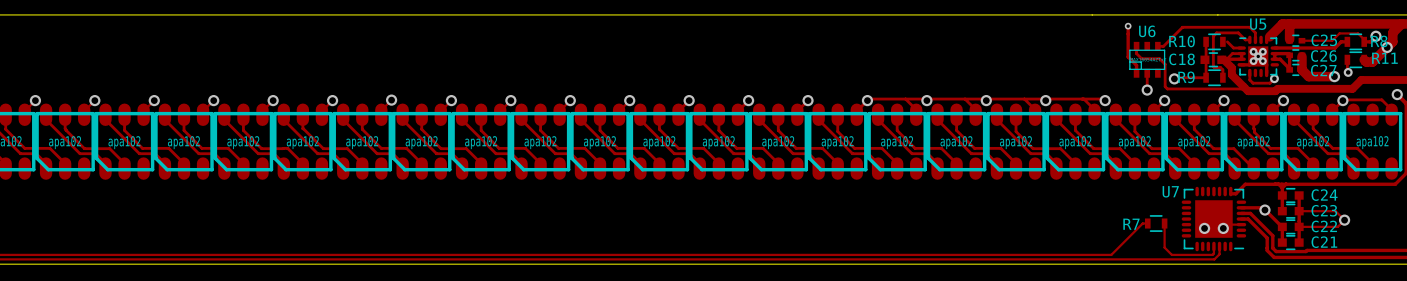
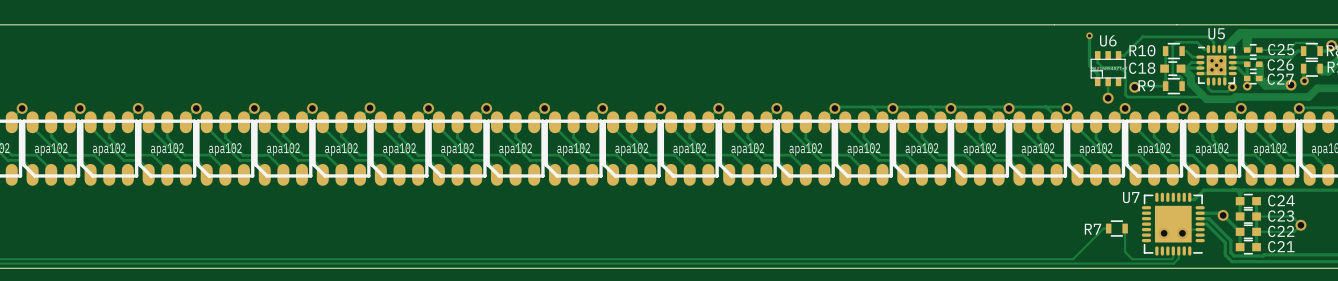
via: none -> (1247, 86)

